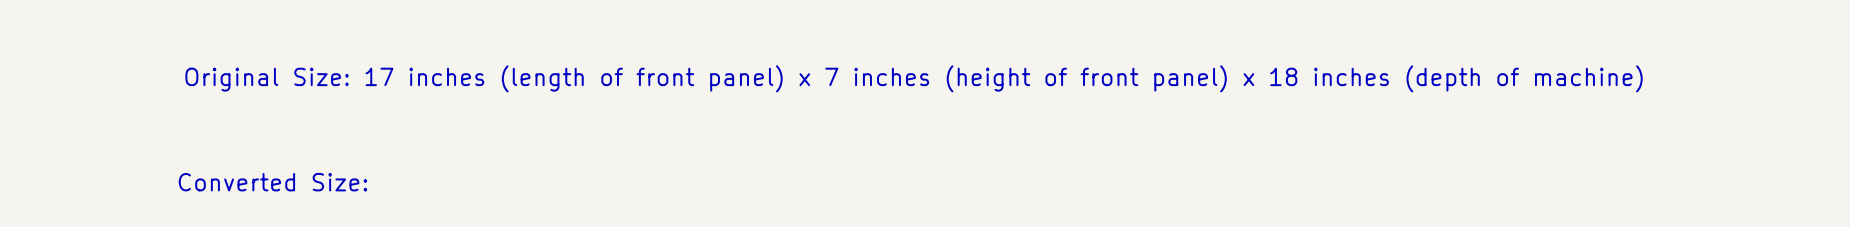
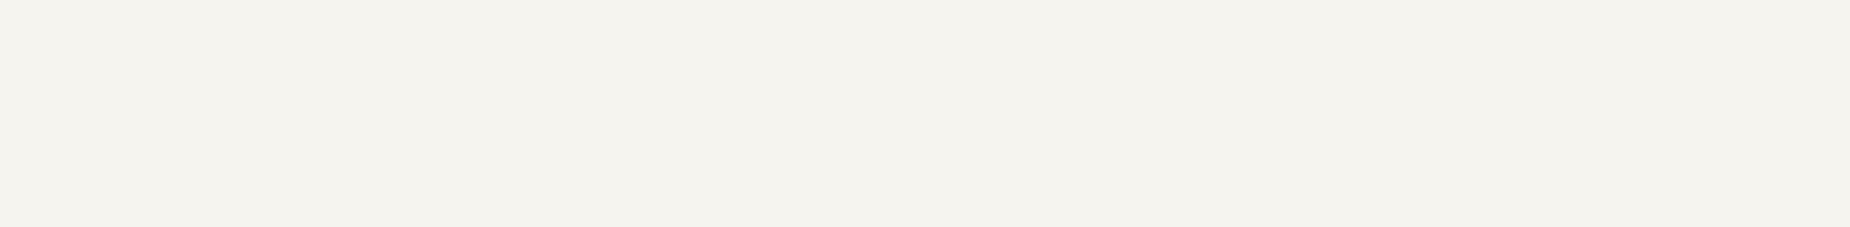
text: Original Size: 17 inches (length of front panel) x 7 inches (height of front panel) x 18 inches (depth of machine) (914, 78) -> none
text: Converted Size: (272, 182) -> none

